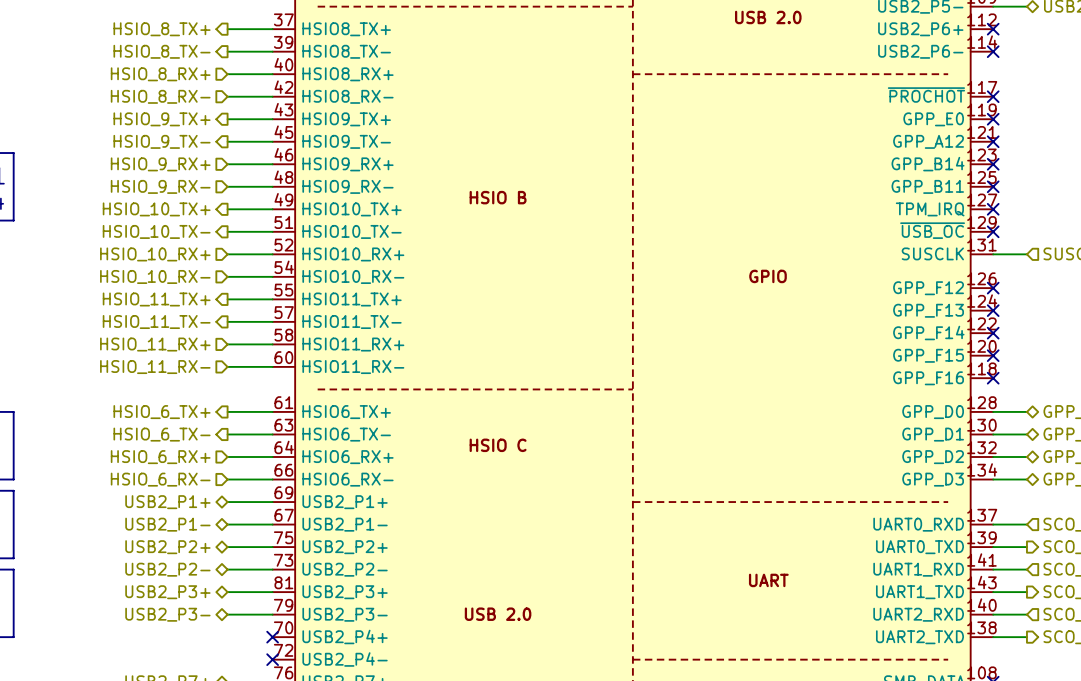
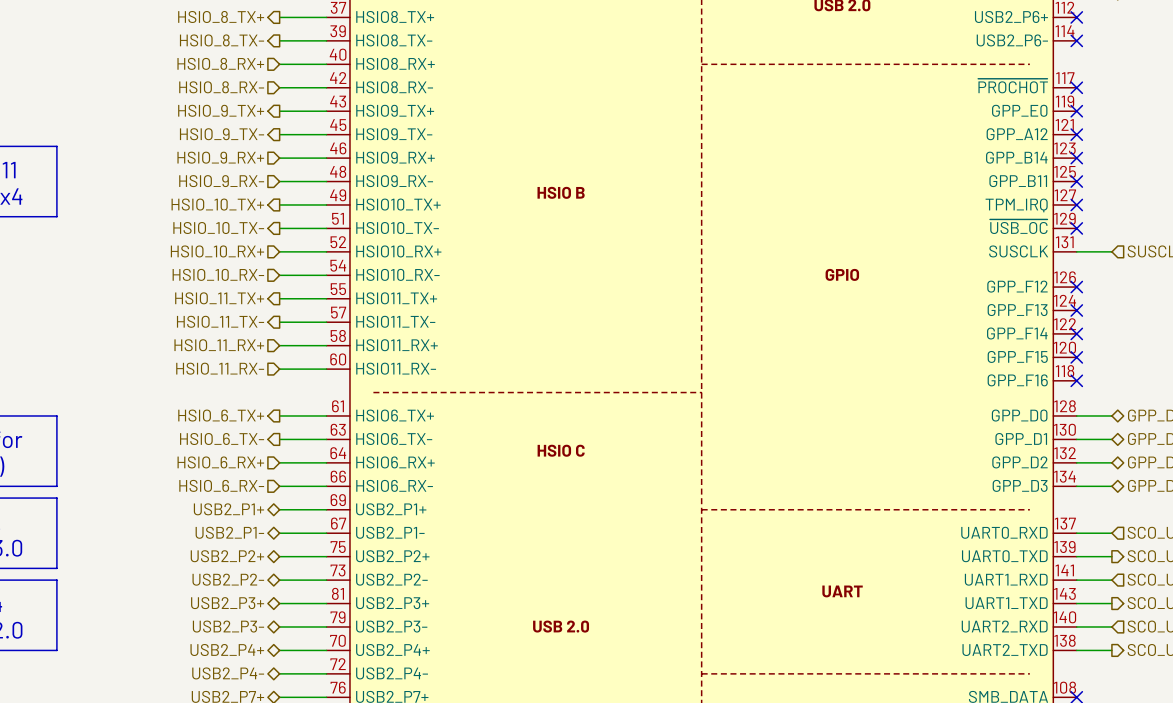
hierarchical label: none -> USB2_P4+ (227, 650)
wire: none -> (279, 650) (326, 650)
no-connect mark: (272, 637) -> none
hierarchical label: none -> USB2_P4- (228, 673)
wire: none -> (279, 673) (326, 673)
no-connect mark: (272, 659) -> none

